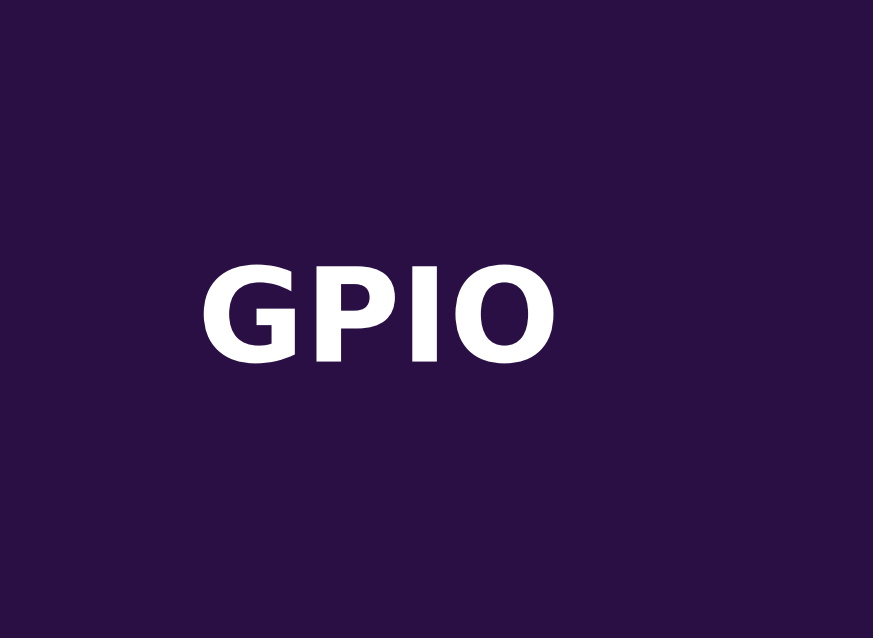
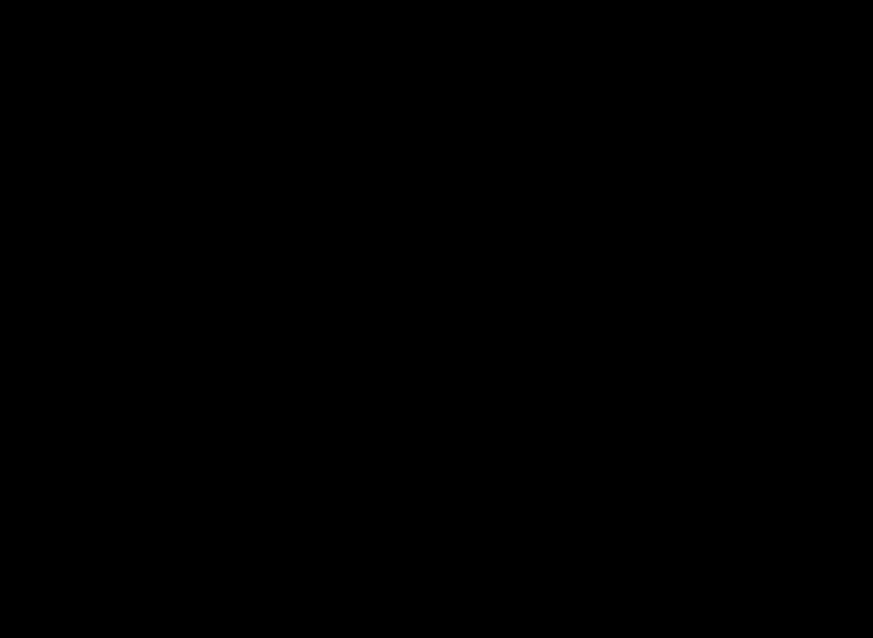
text: GPIO (378, 313) -> none

